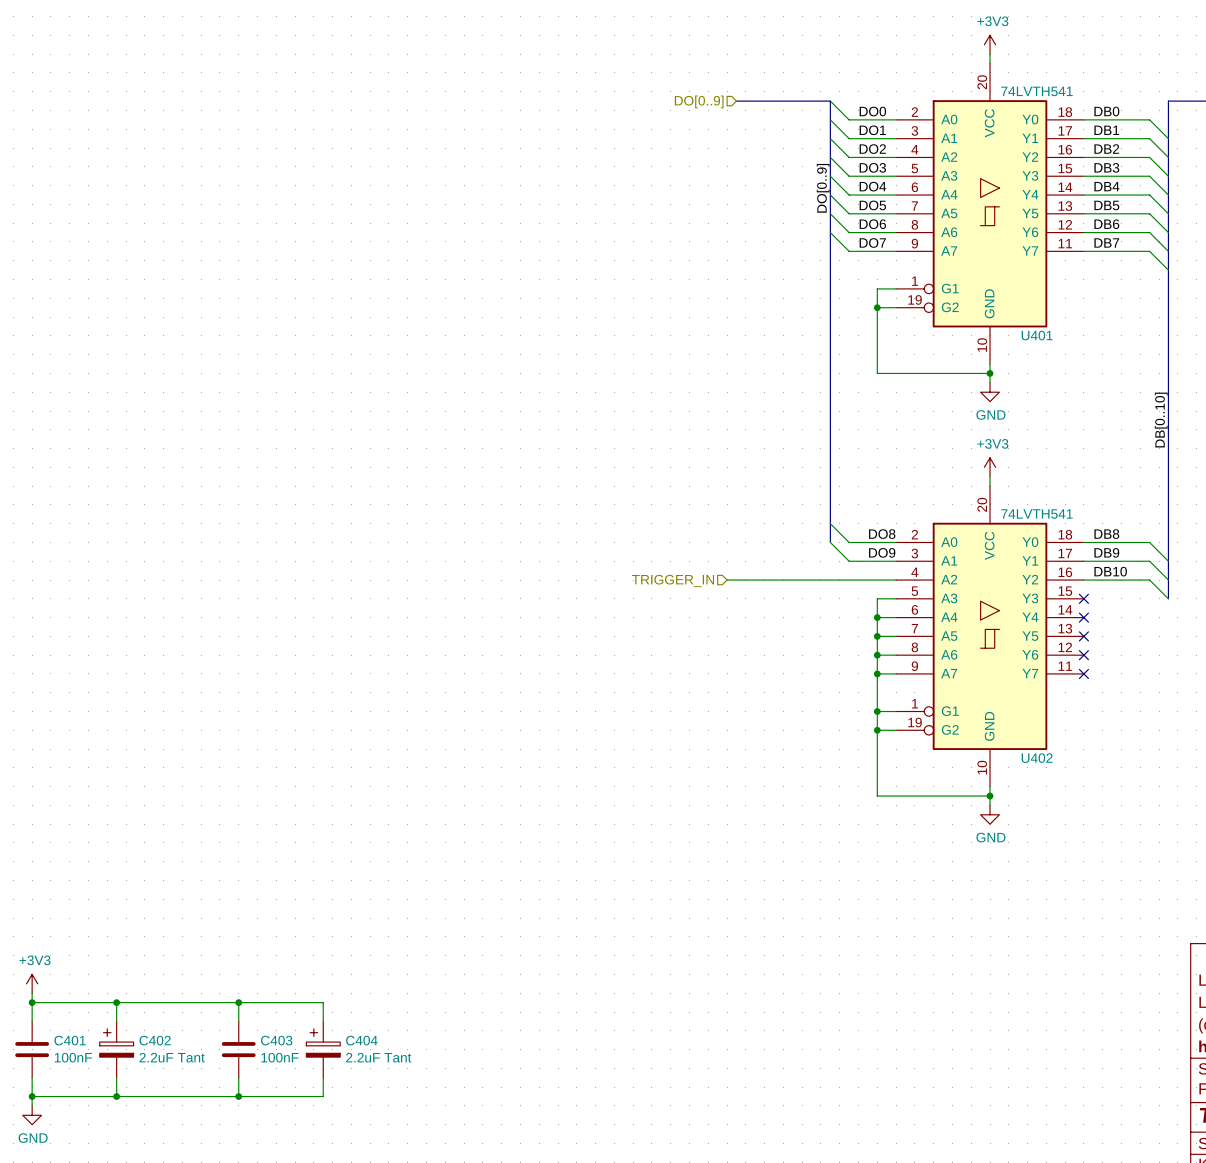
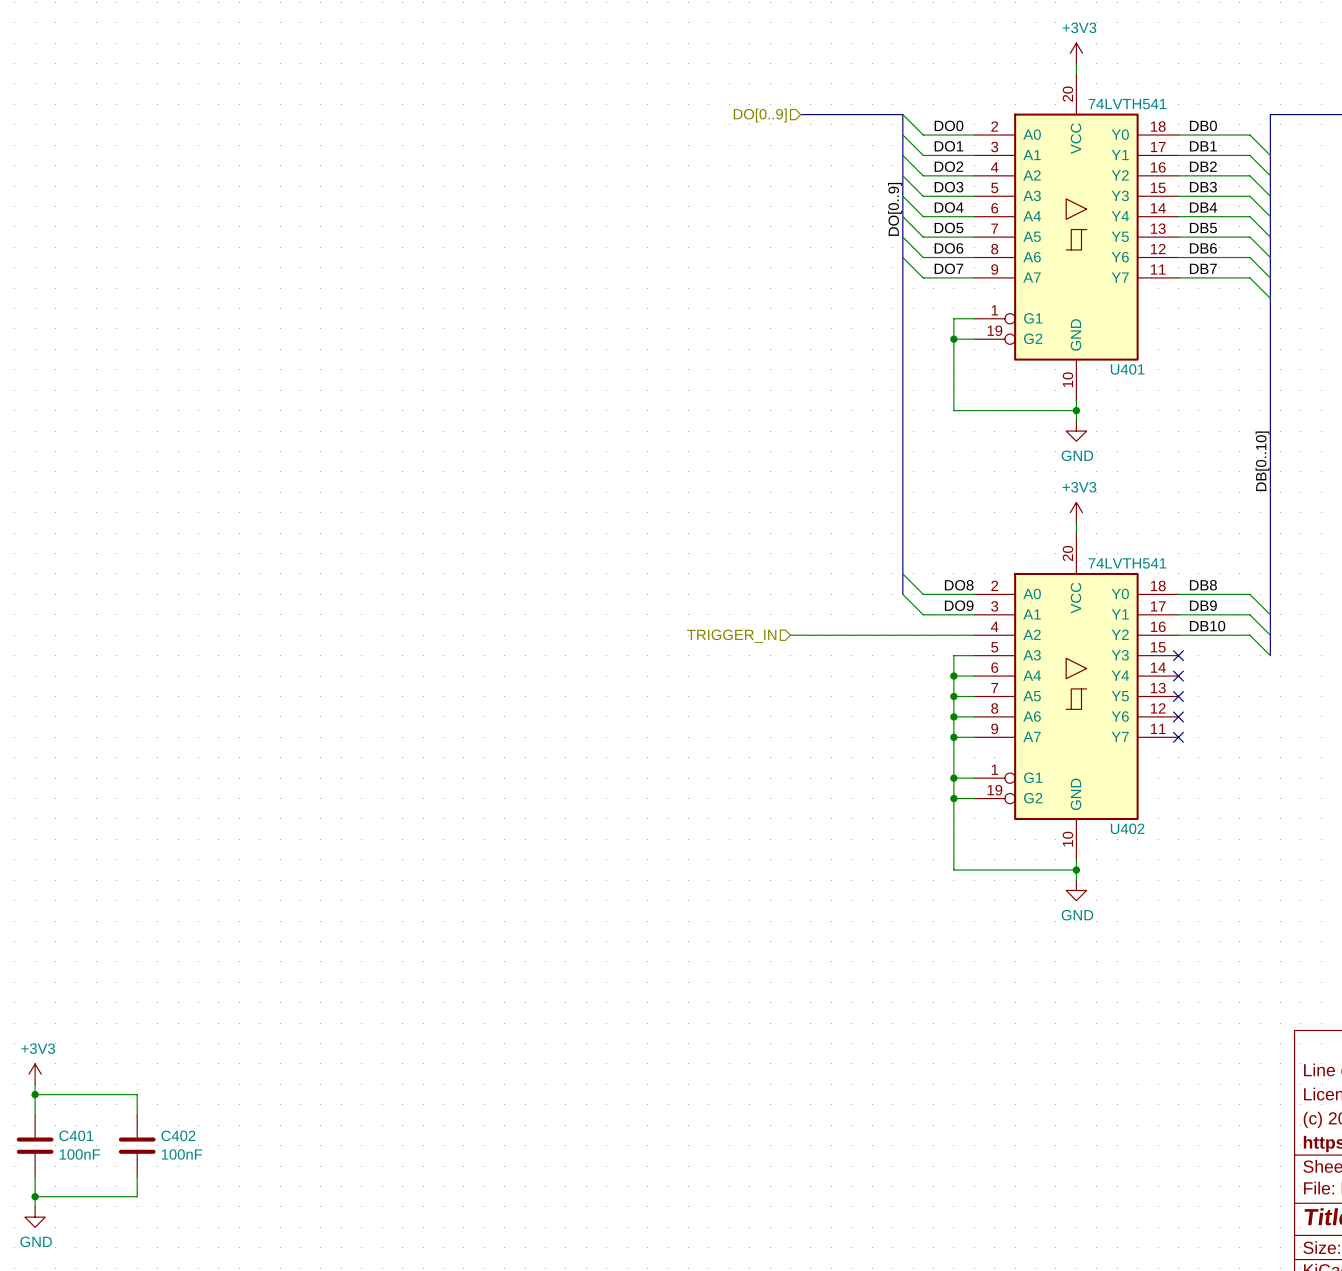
wire: (116, 1002) (116, 1021) -> none
junction: (116, 1002) -> none
wire: (126, 1002) (323, 1002) (323, 1021) -> (137, 1094) (137, 1115)
wire: (238, 1002) (238, 1021) -> none
junction: (238, 1002) -> none
C402 symbol: [99, 1021, 134, 1078] -> [118, 1115, 156, 1177]
C403: 100nF (238, 1049) -> none
C404: 2.2uF Tant (323, 1049) -> none
C402 value: 2.2uF Tant (172, 1057) -> 100nF (181, 1154)
wire: (116, 1077) (116, 1096) -> none
wire: (238, 1077) (238, 1096) -> none
wire: (323, 1077) (323, 1096) (126, 1096) -> (137, 1176) (137, 1196)
junction: (116, 1096) -> none
junction: (238, 1096) -> none

